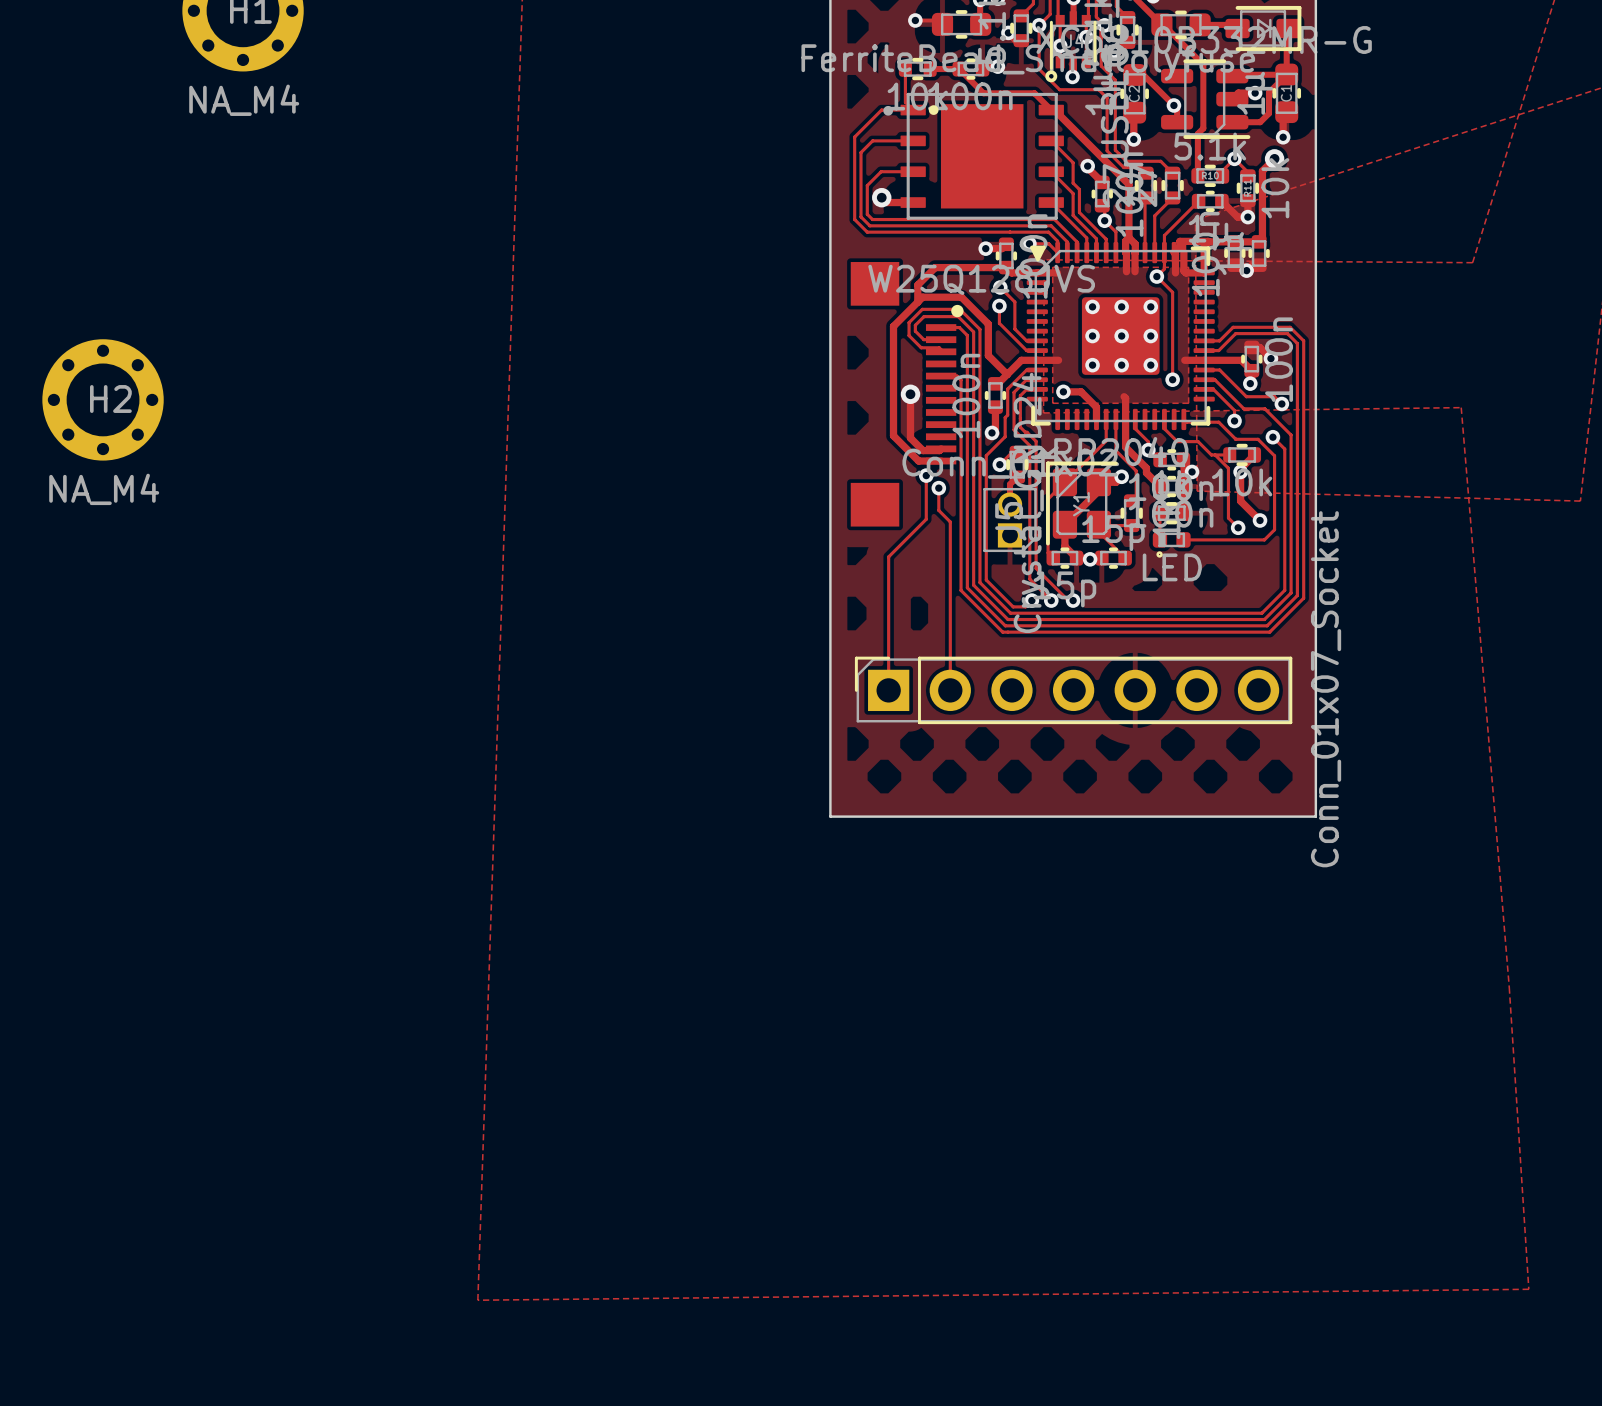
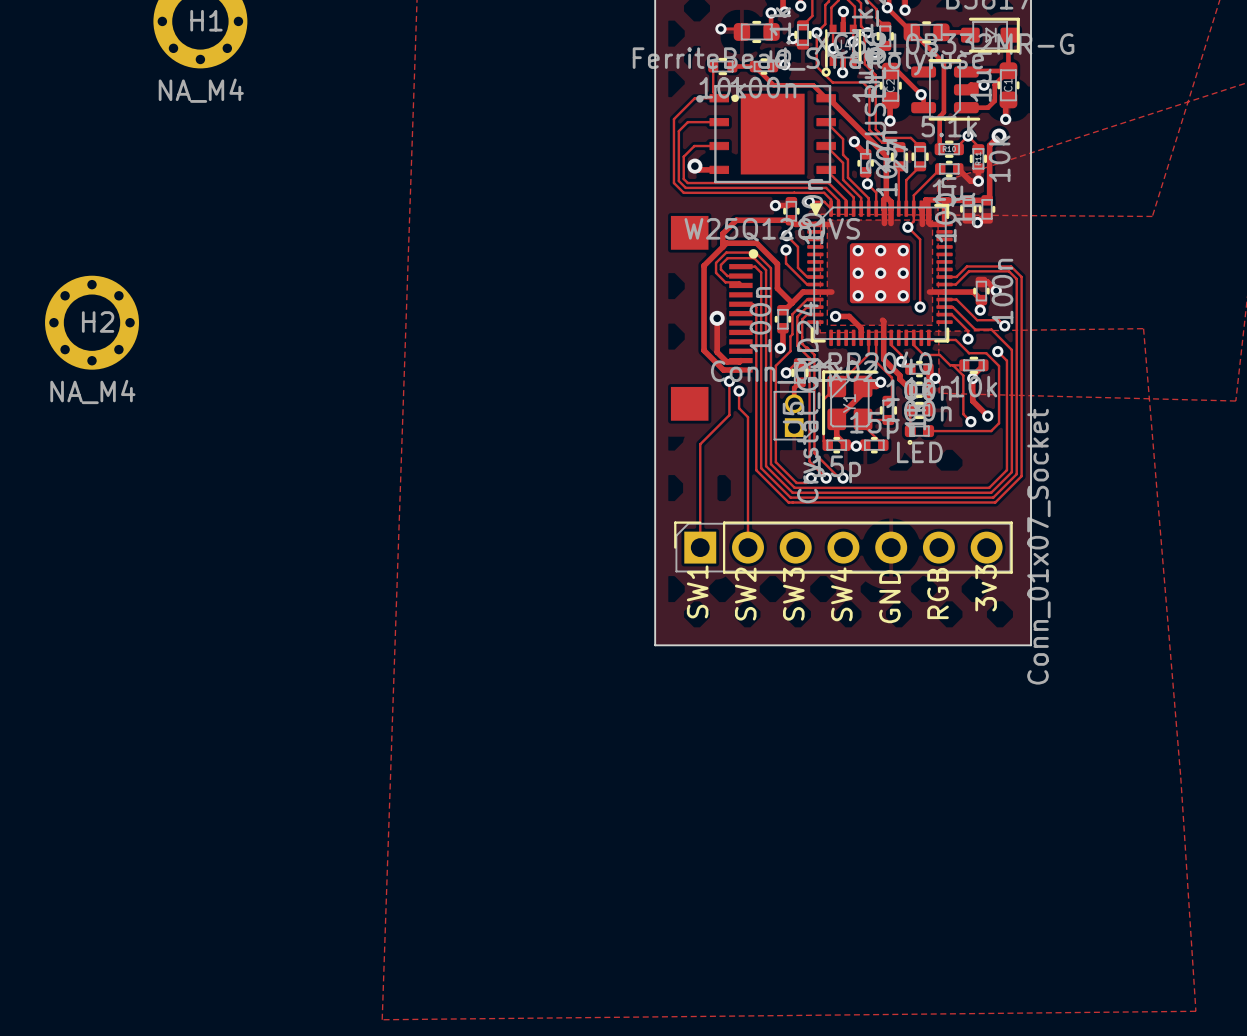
text: none -> 3v3 (986, 588)
text: none -> SW1 (697, 591)
text: none -> RGB (938, 593)
text: none -> SW2 (745, 594)
text: none -> SW3 (793, 594)
text: none -> SW4 (841, 594)
text: none -> GND (889, 596)

